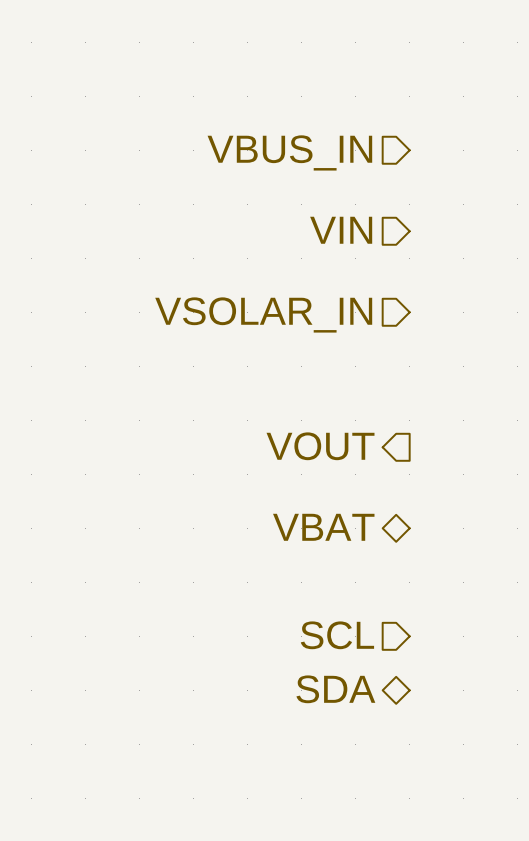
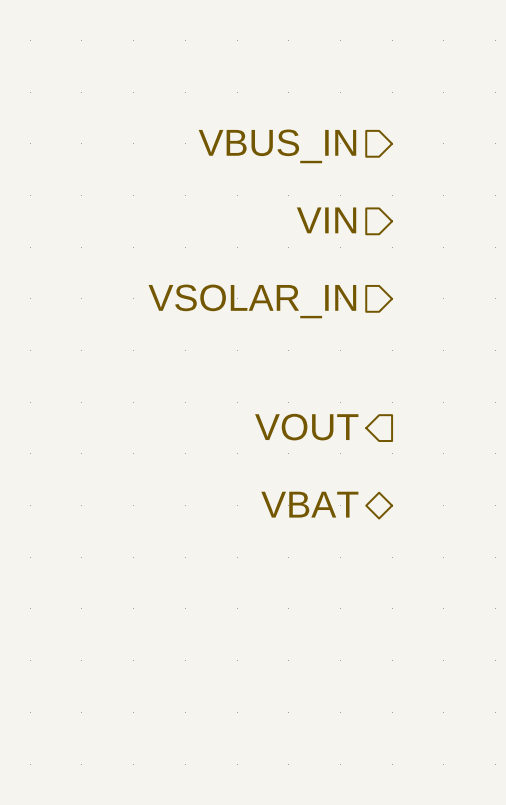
hierarchical label: SCL (337, 635) -> none
hierarchical label: SDA (335, 689) -> none

